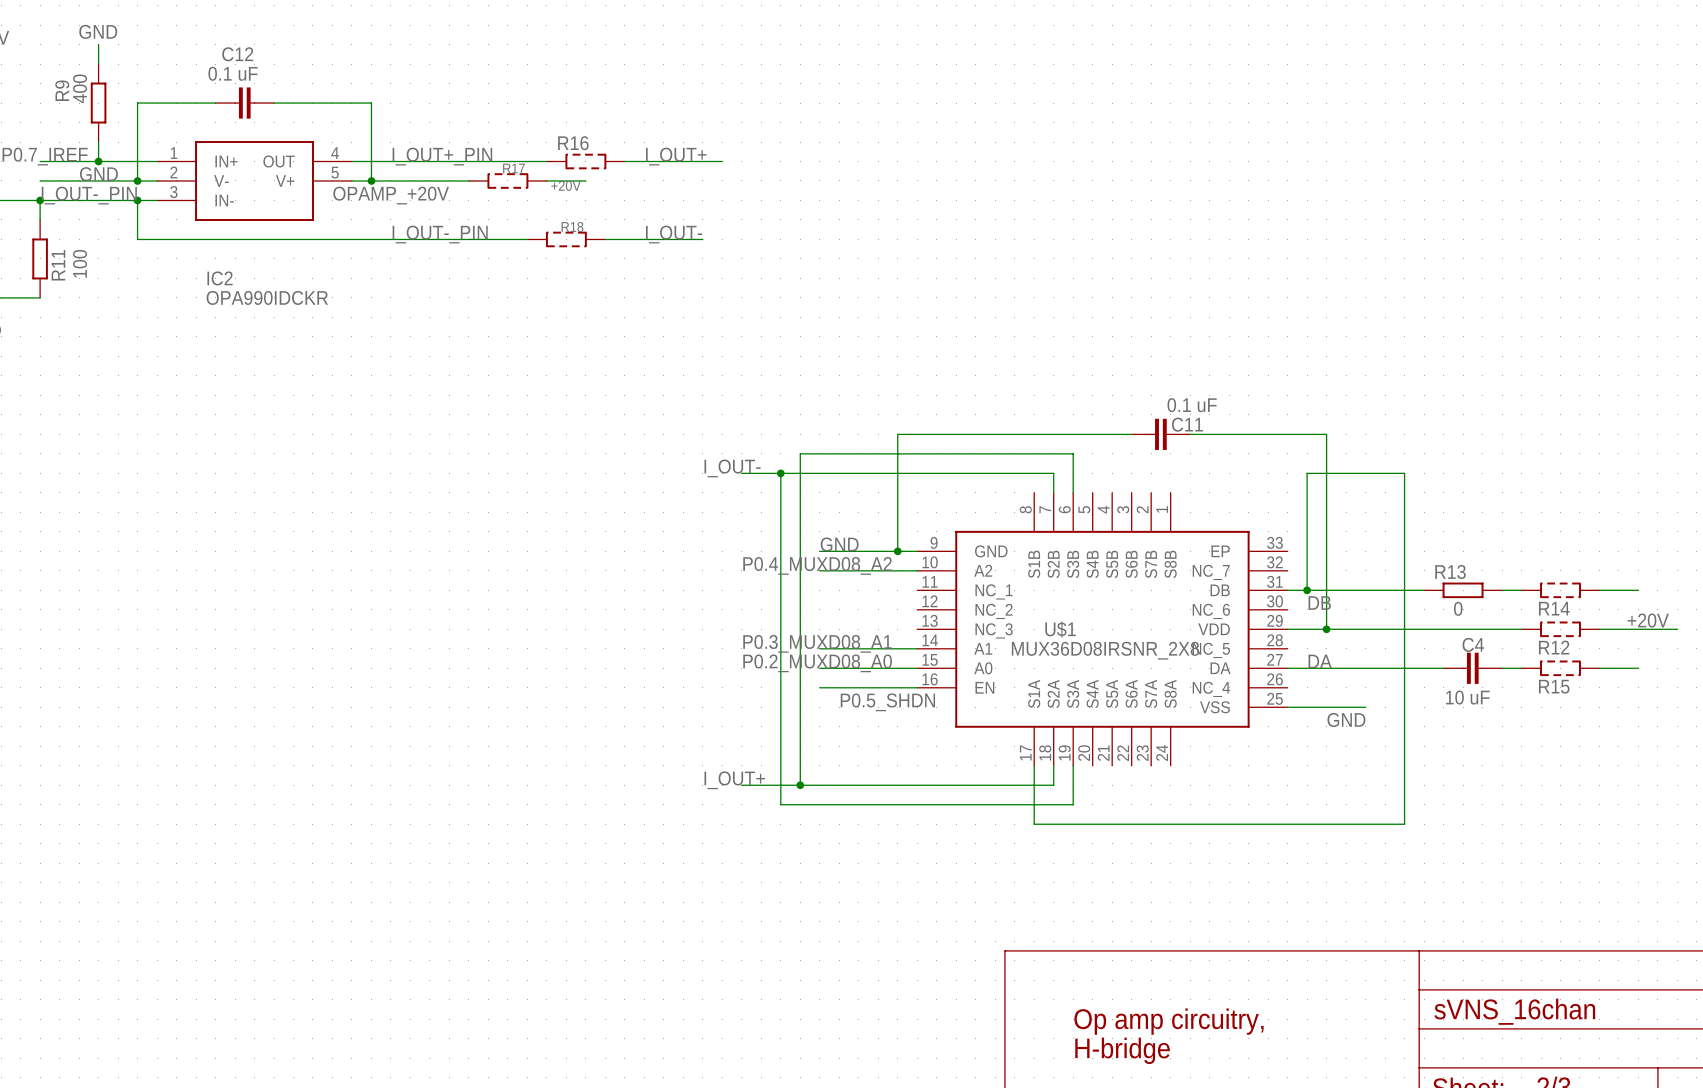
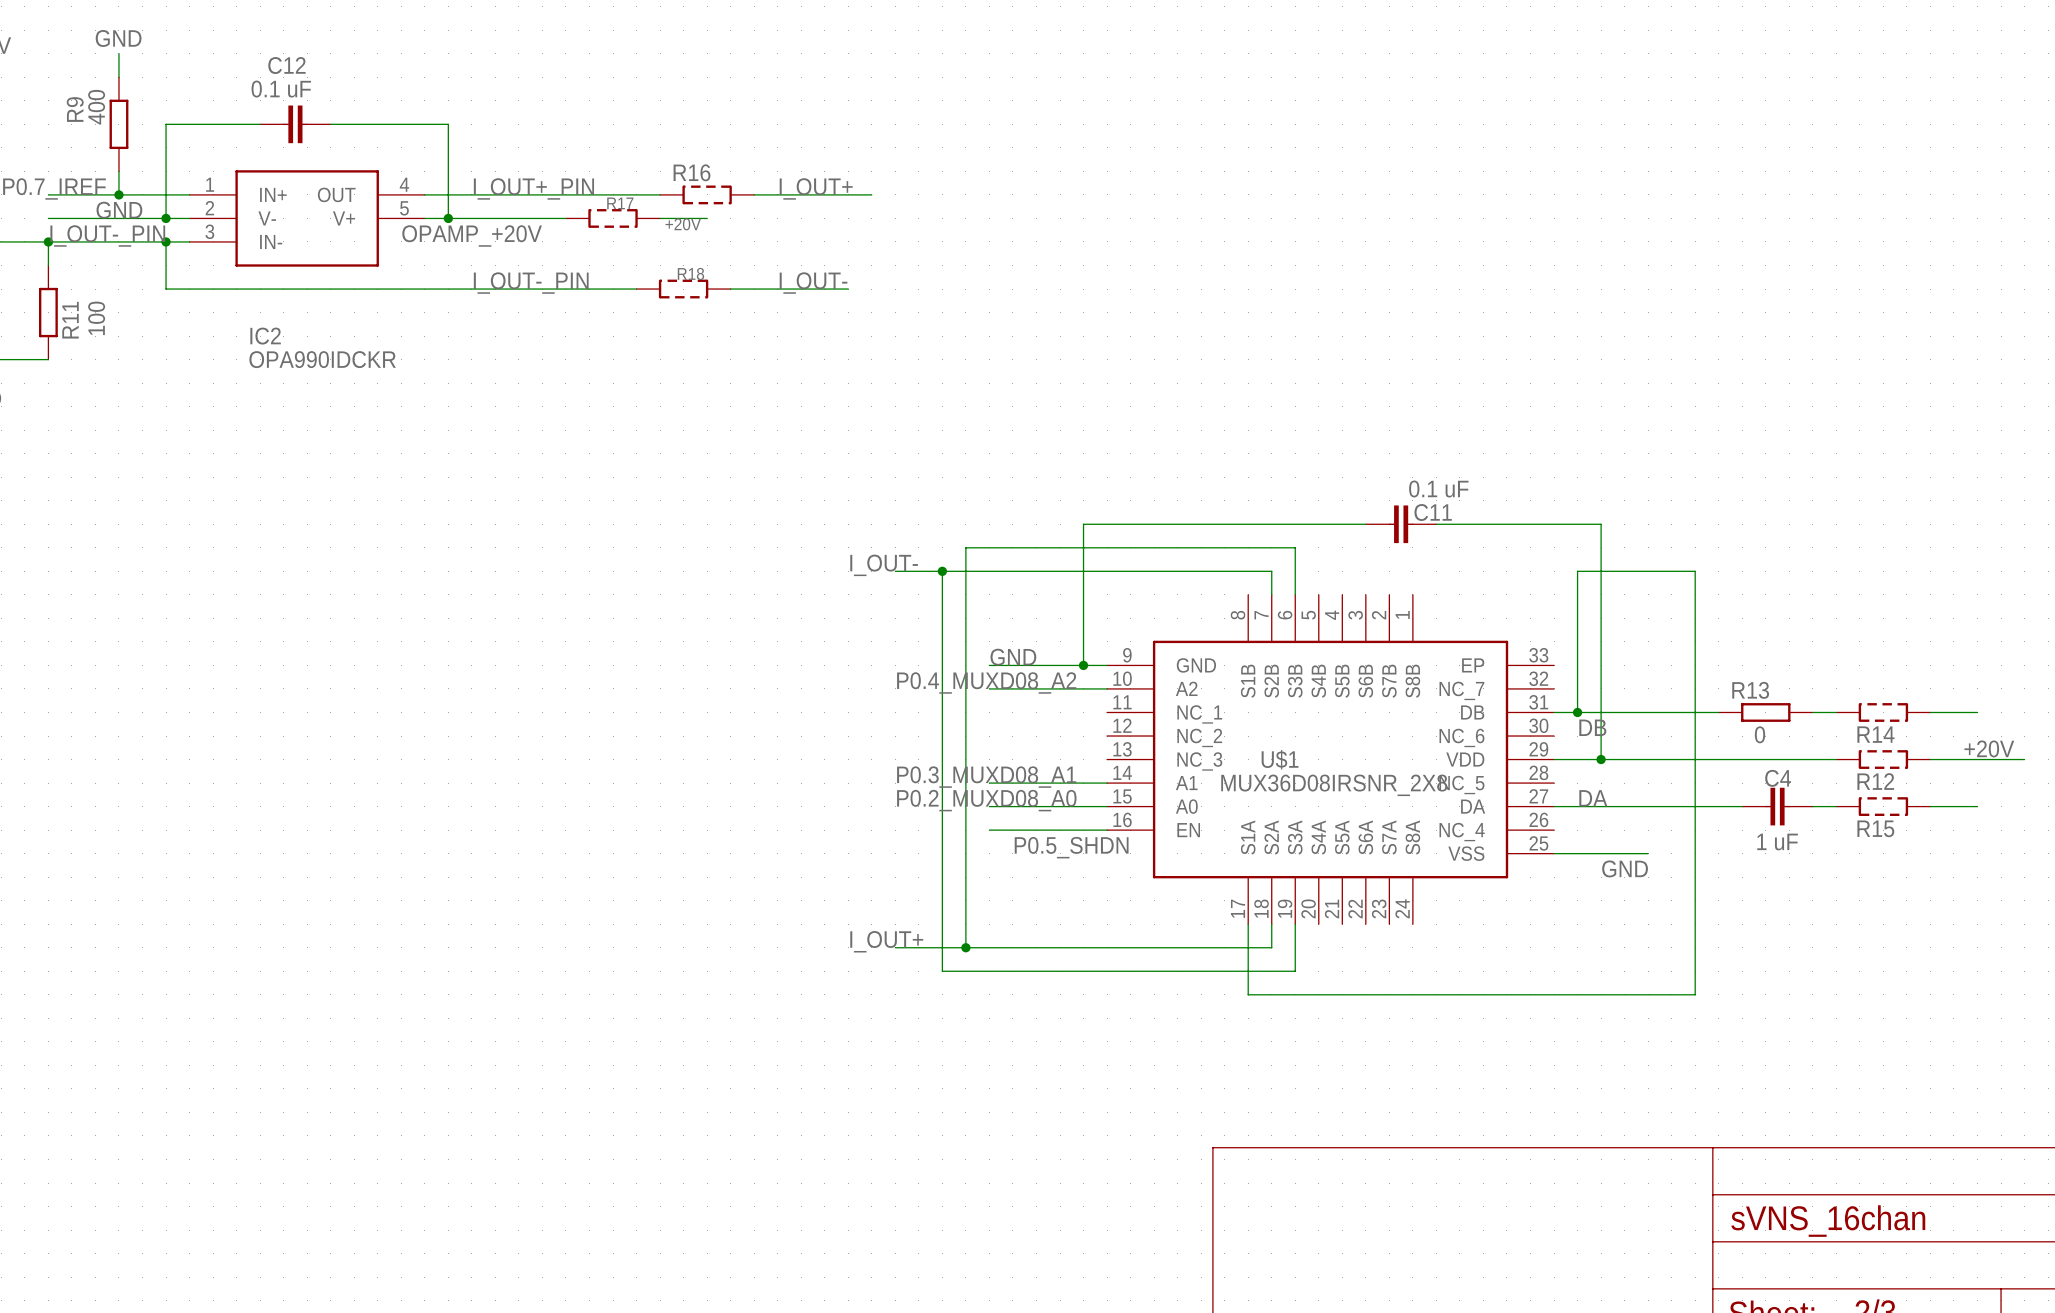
C4 value: 10 uF (1467, 697) -> 1 uF (1777, 841)
text: Op amp circuitry, (1169, 1021) -> none
text: H-bridge (1122, 1050) -> none

